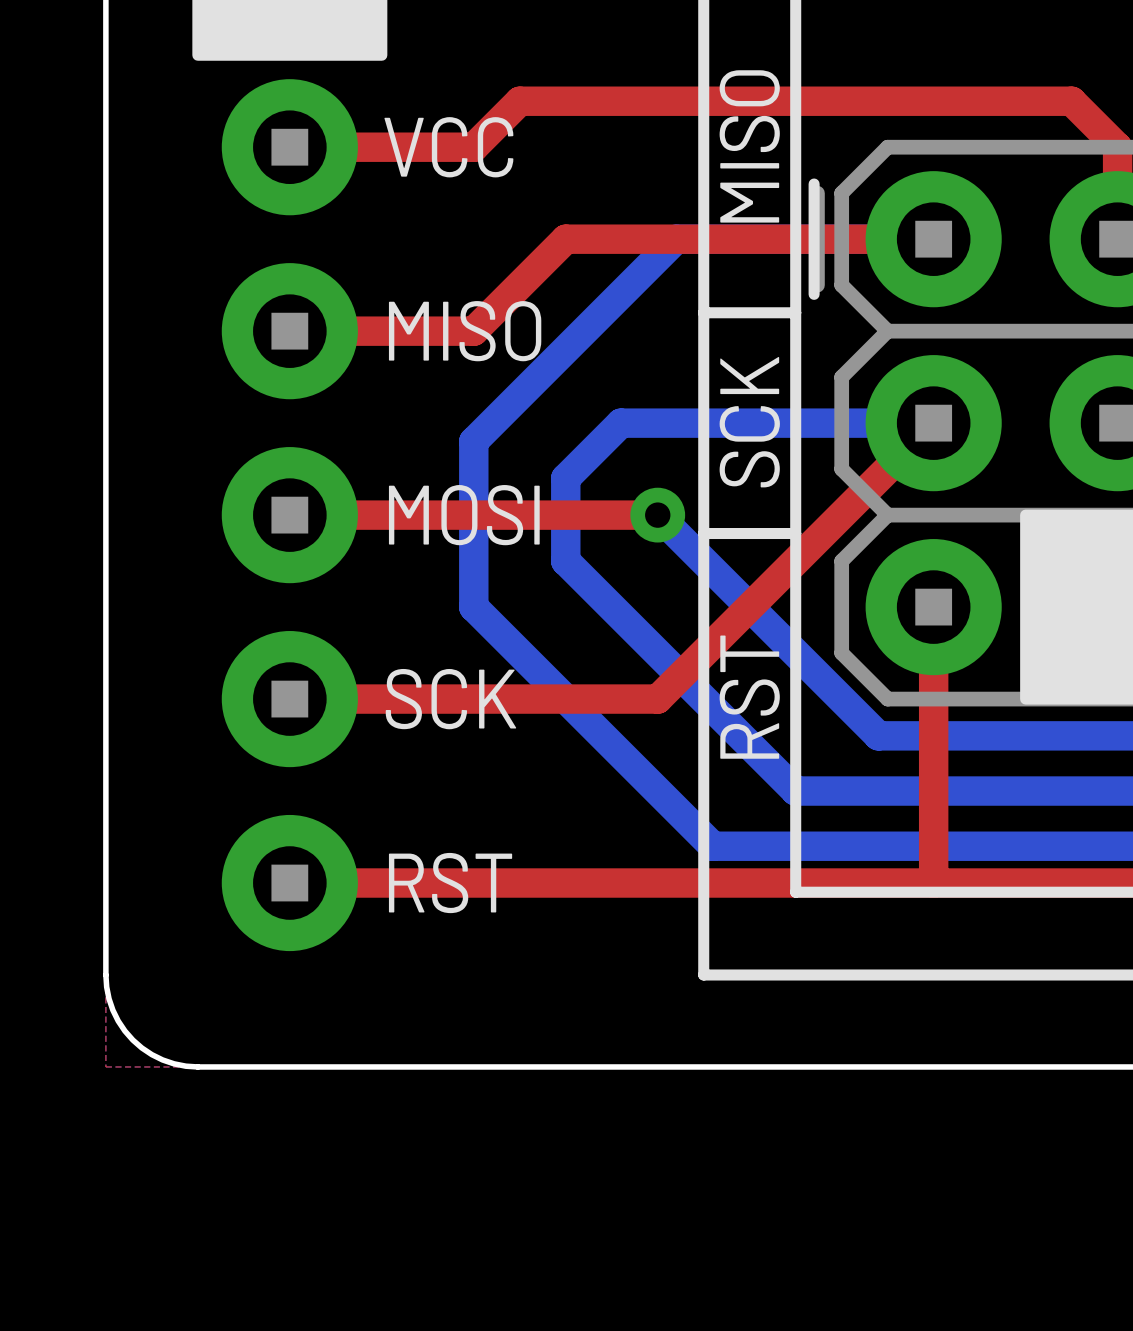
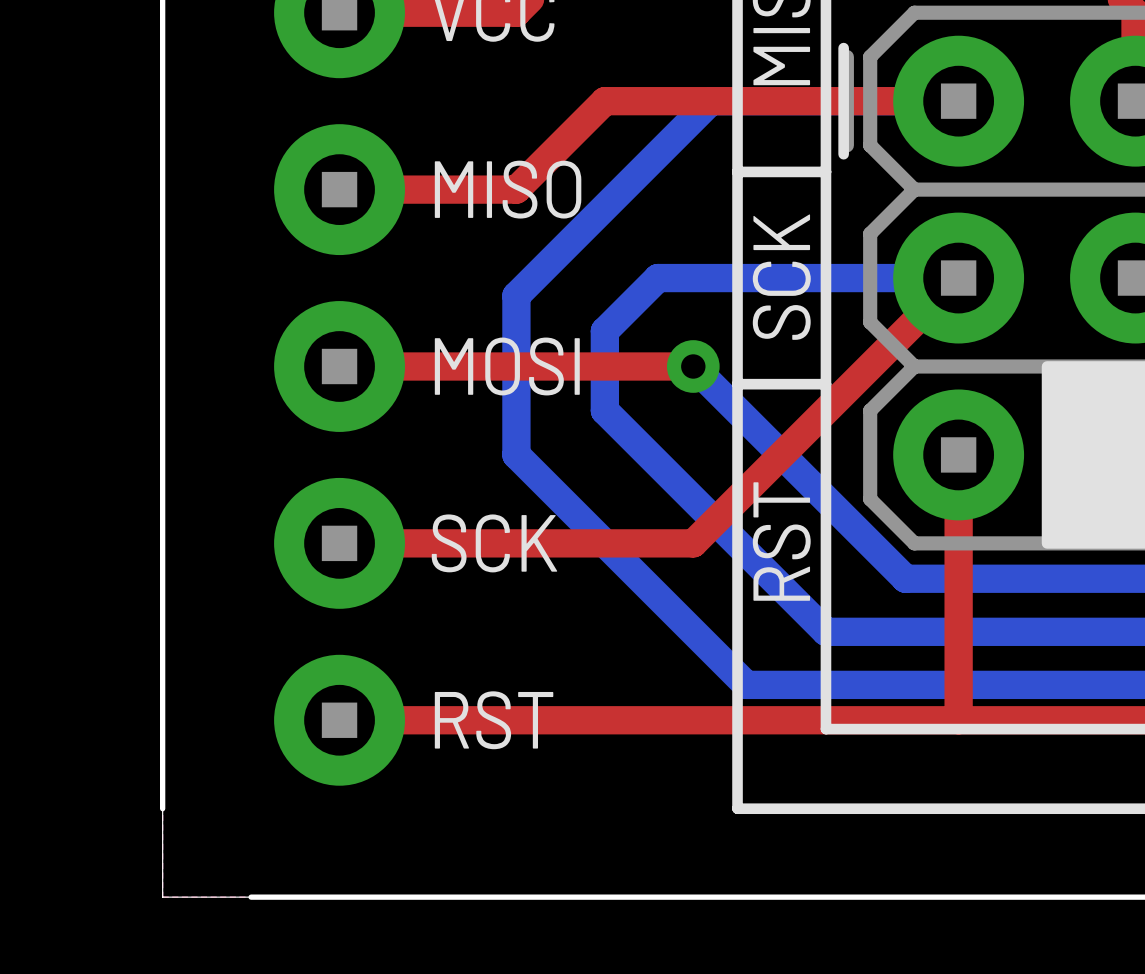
board edge: (105, 974) (109, 998) (112, 1010) (118, 1020) (132, 1040) (151, 1054) (162, 1059) (174, 1063) (197, 1066) -> (162, 808) (162, 897) (251, 897)

